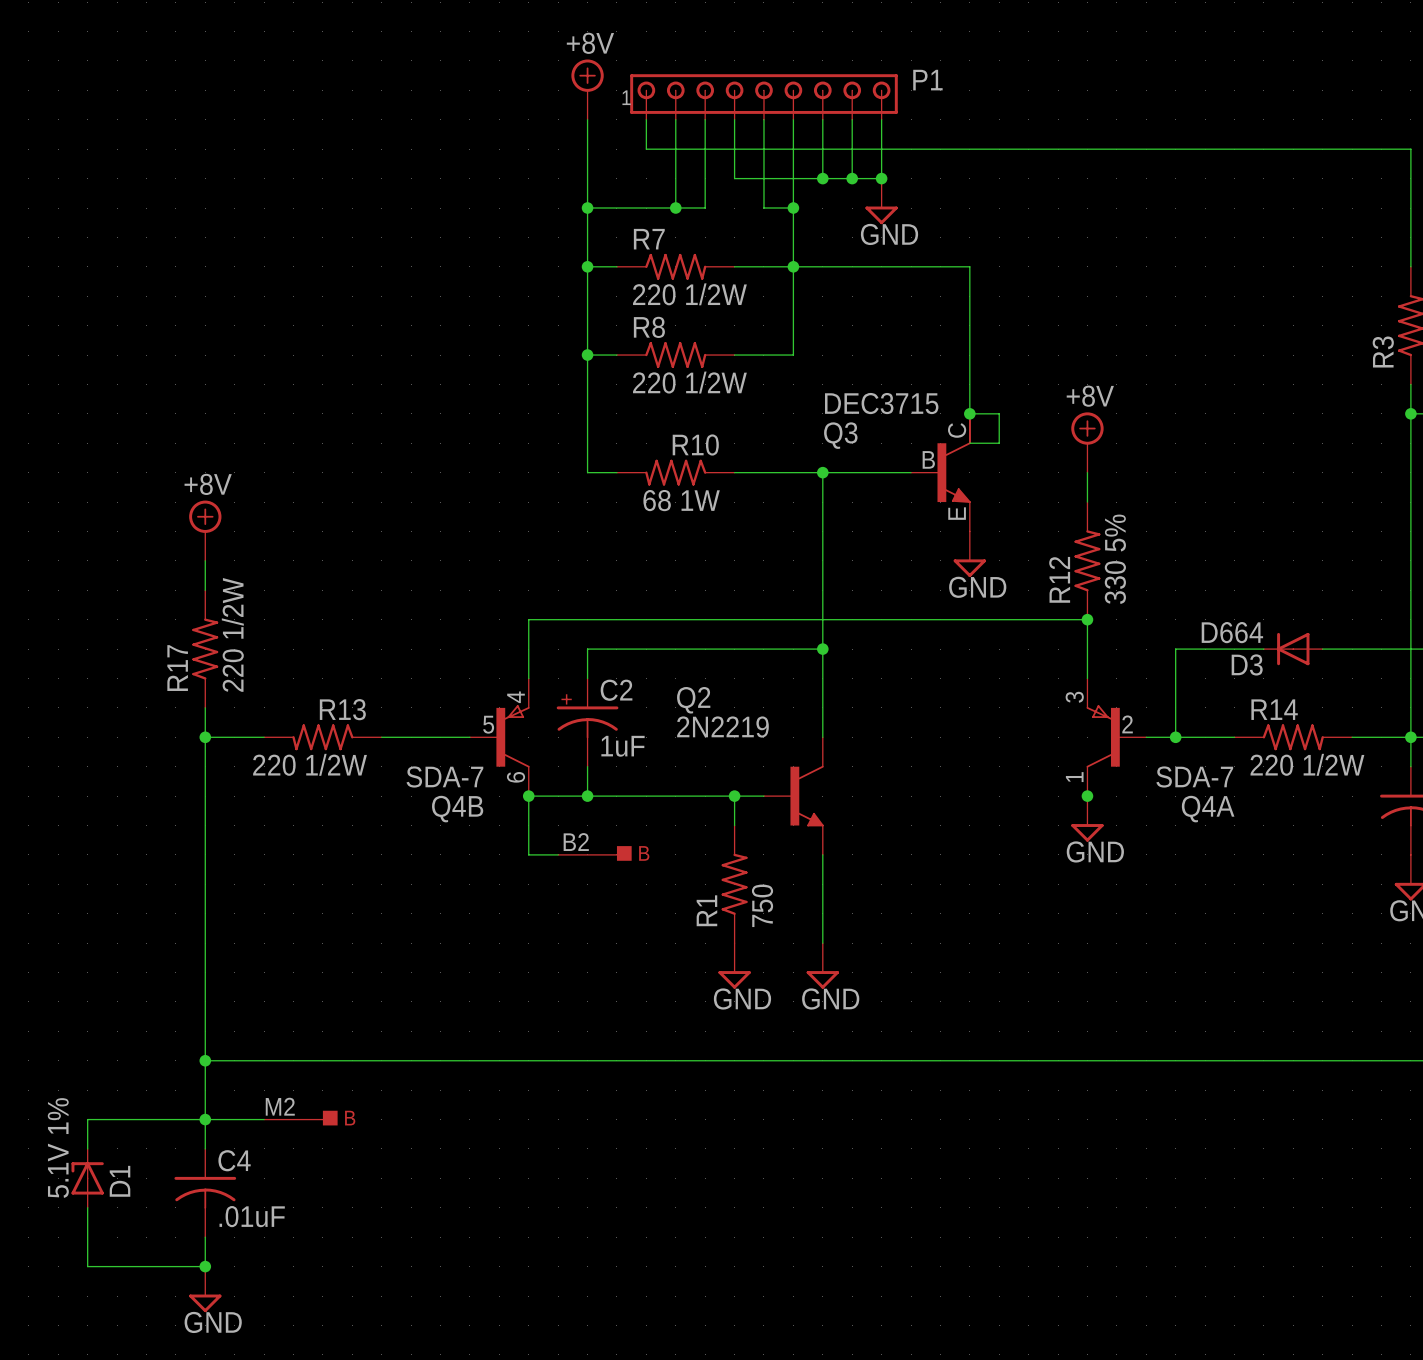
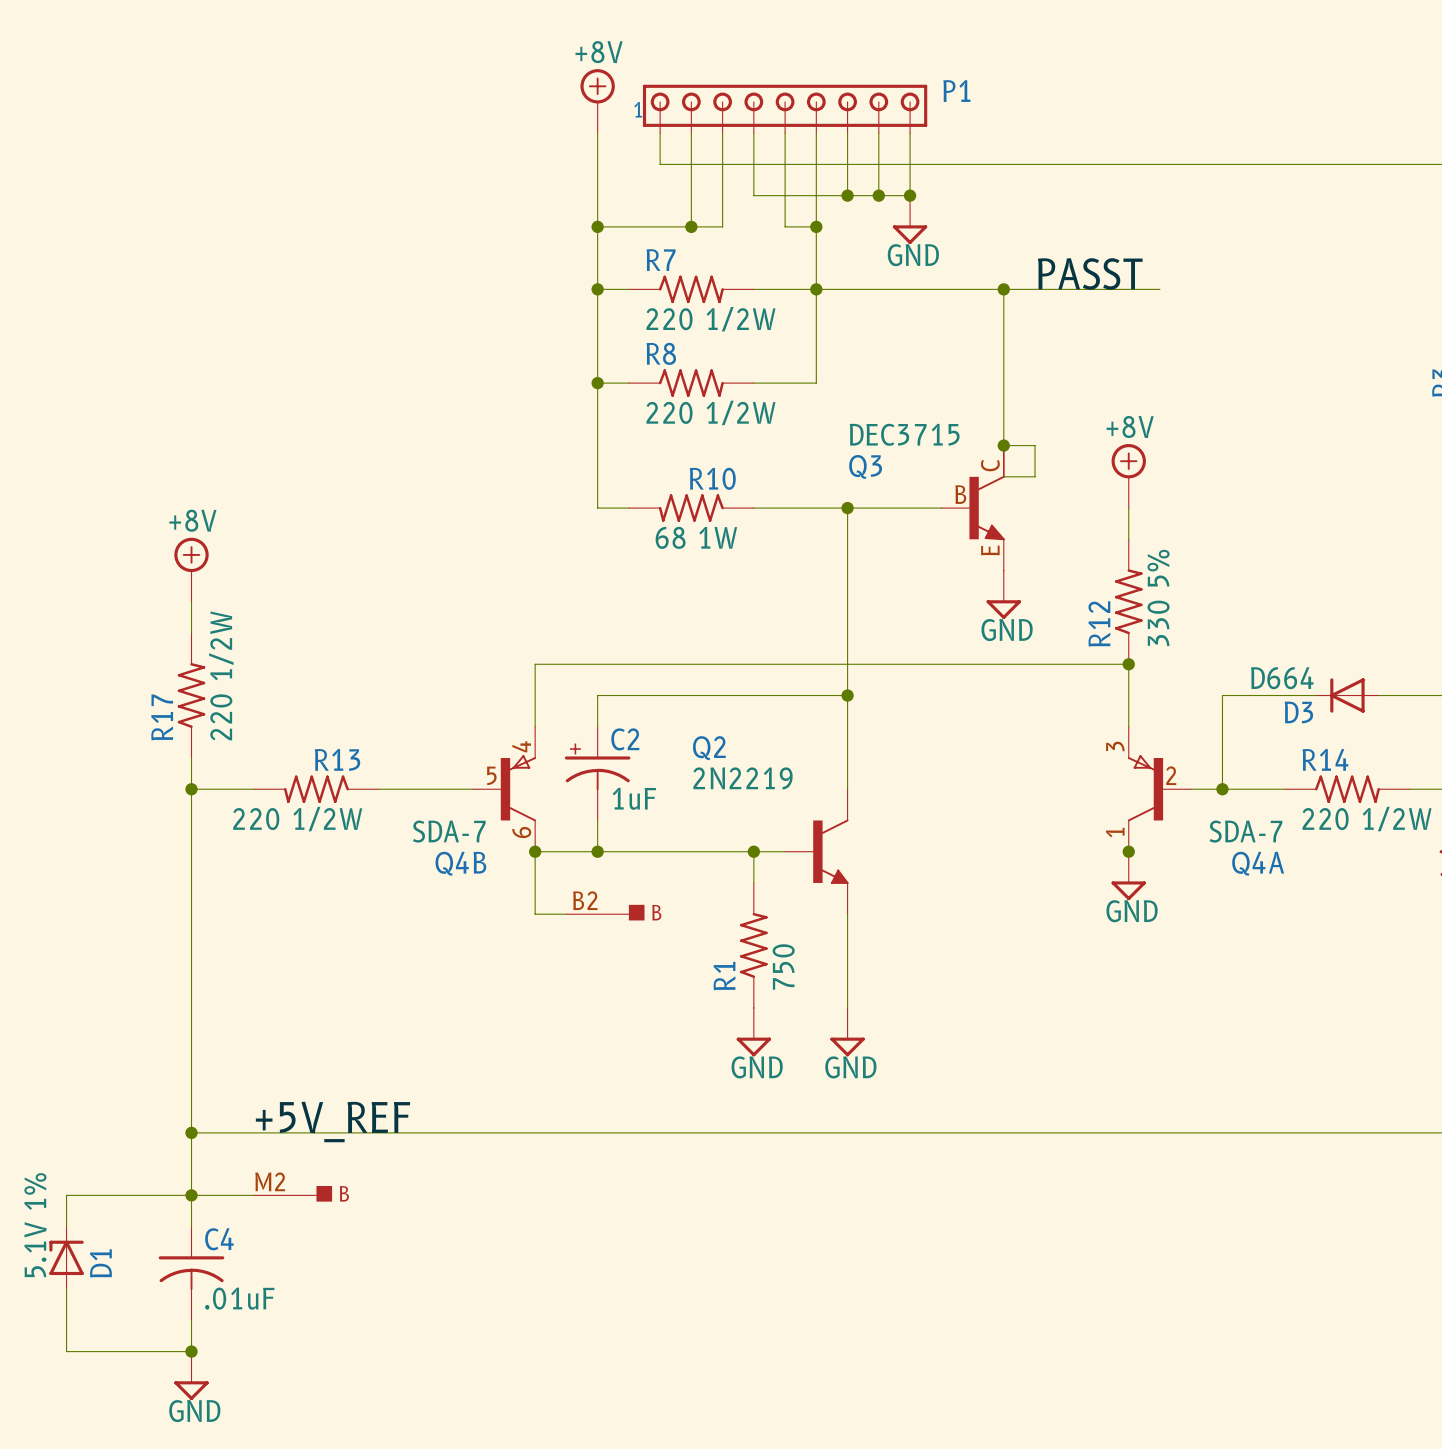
label: none -> PASST (1090, 273)
wire: none -> (1003, 289) (1159, 289)
junction: none -> (1003, 289)
label: none -> +5V_REF (333, 1121)

